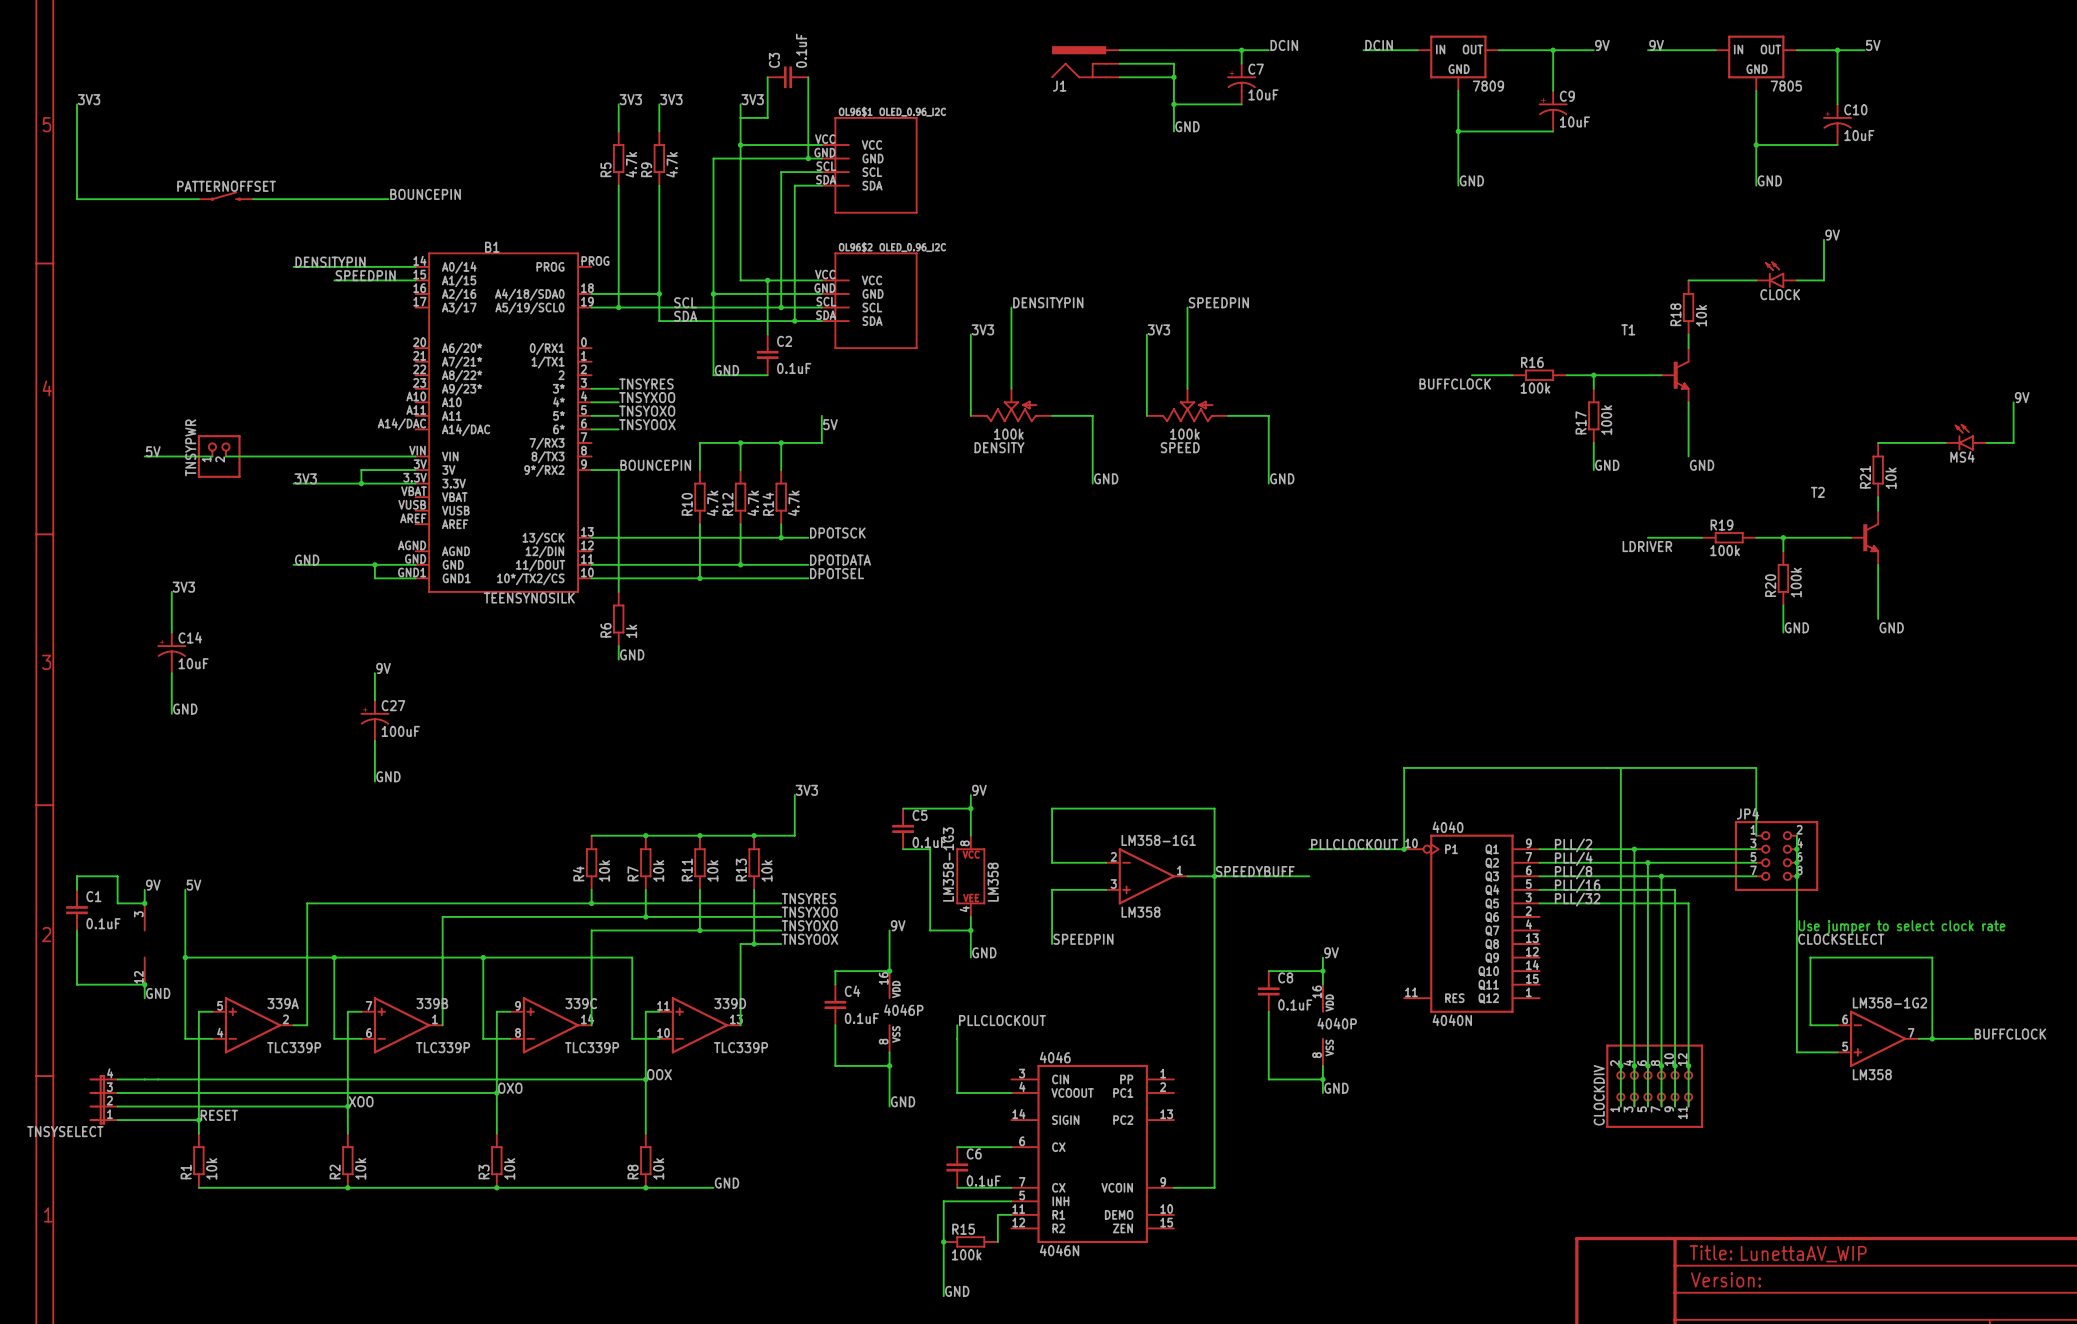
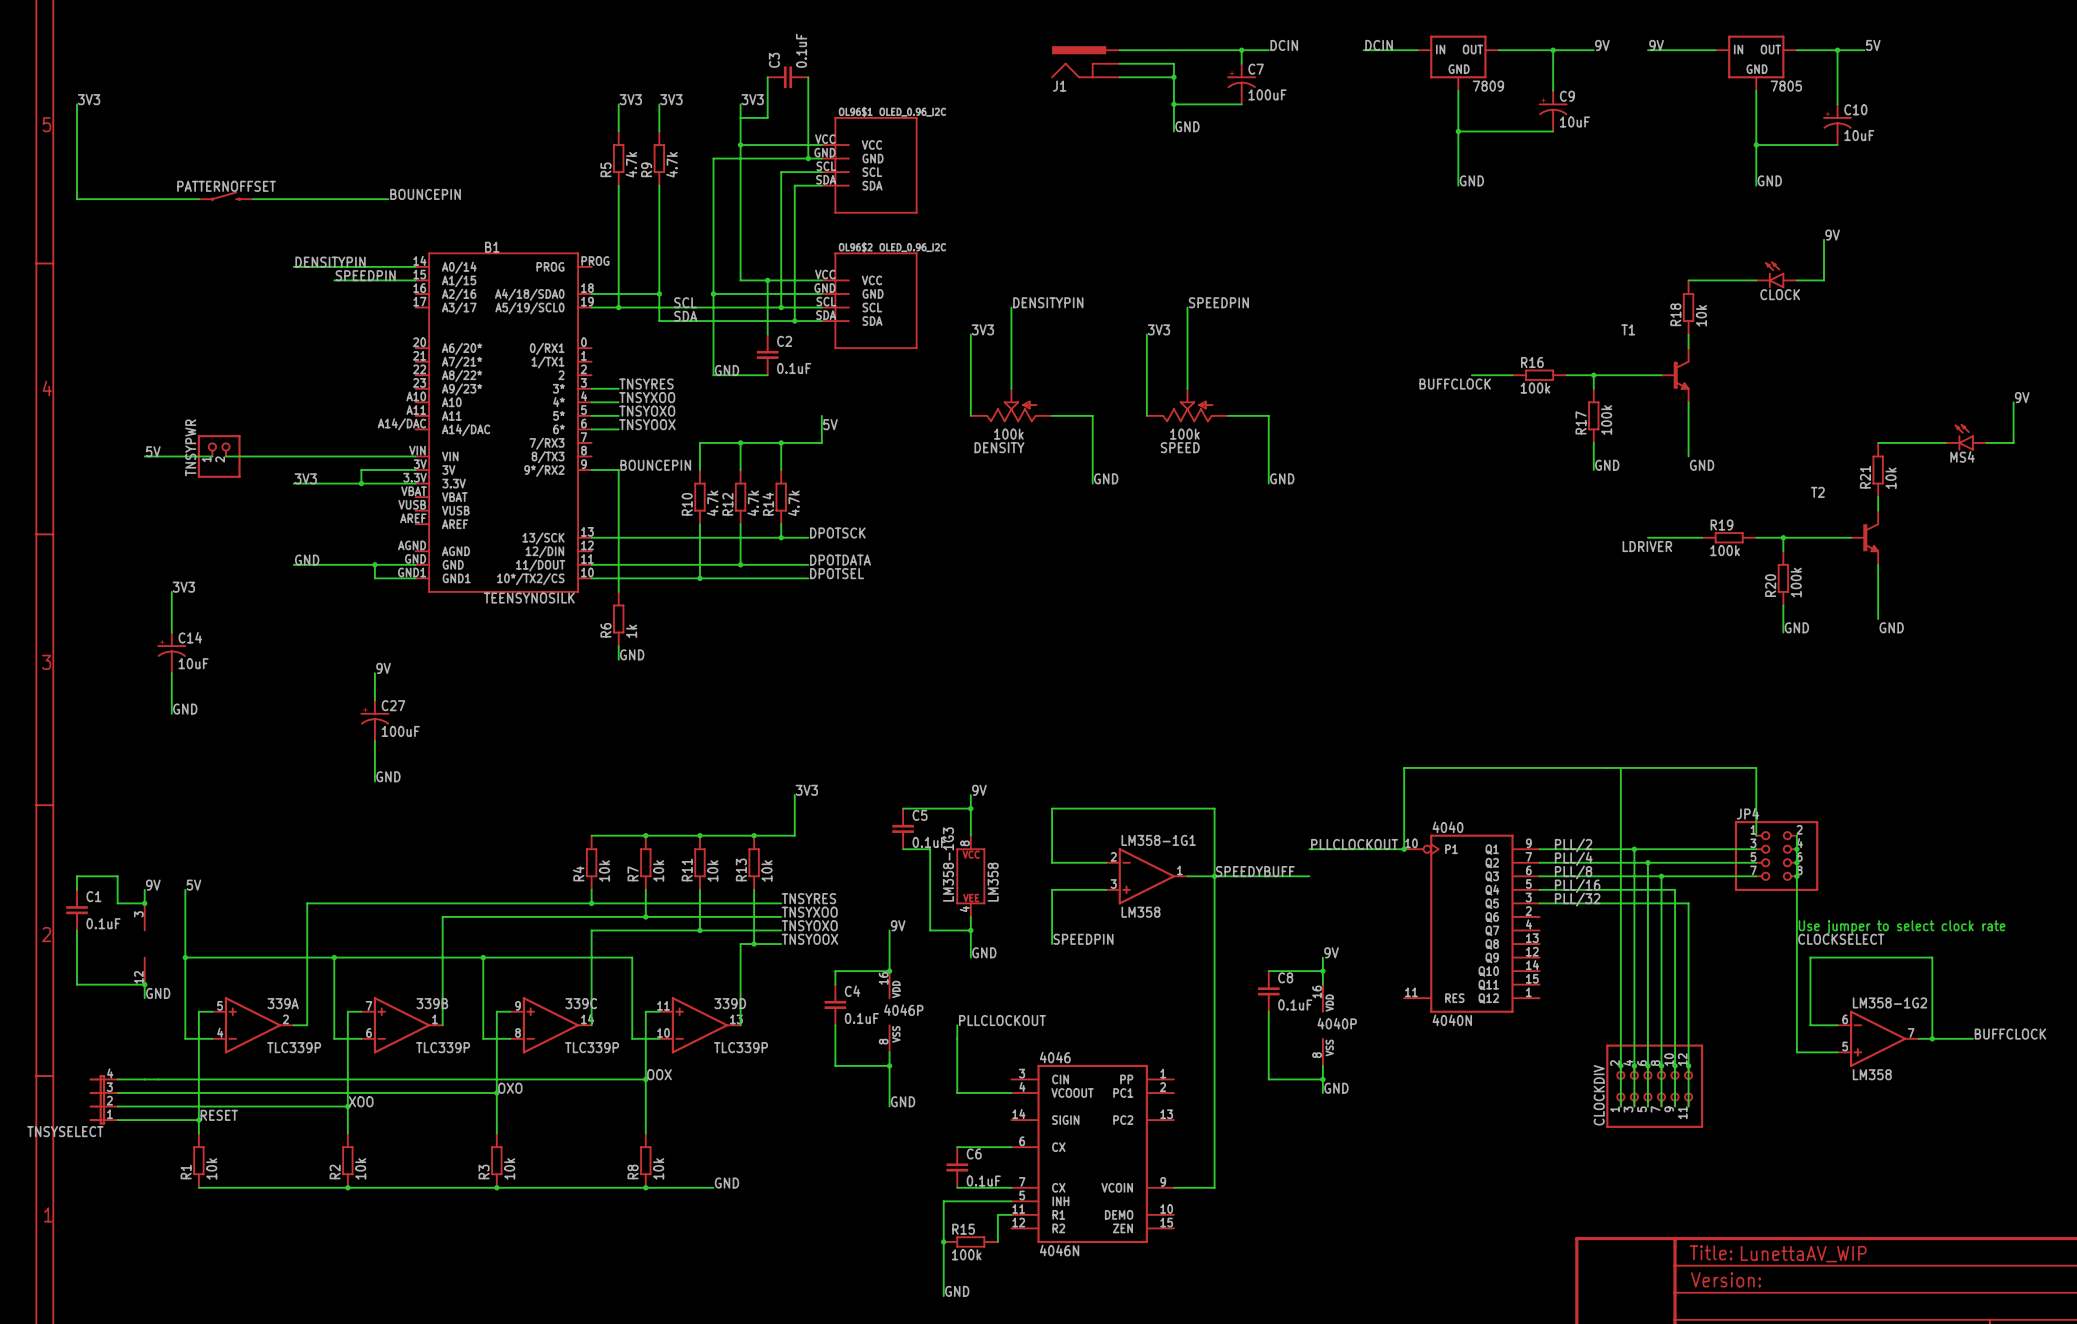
C7 value: 10uF (1263, 94) -> 100uF (1267, 94)

